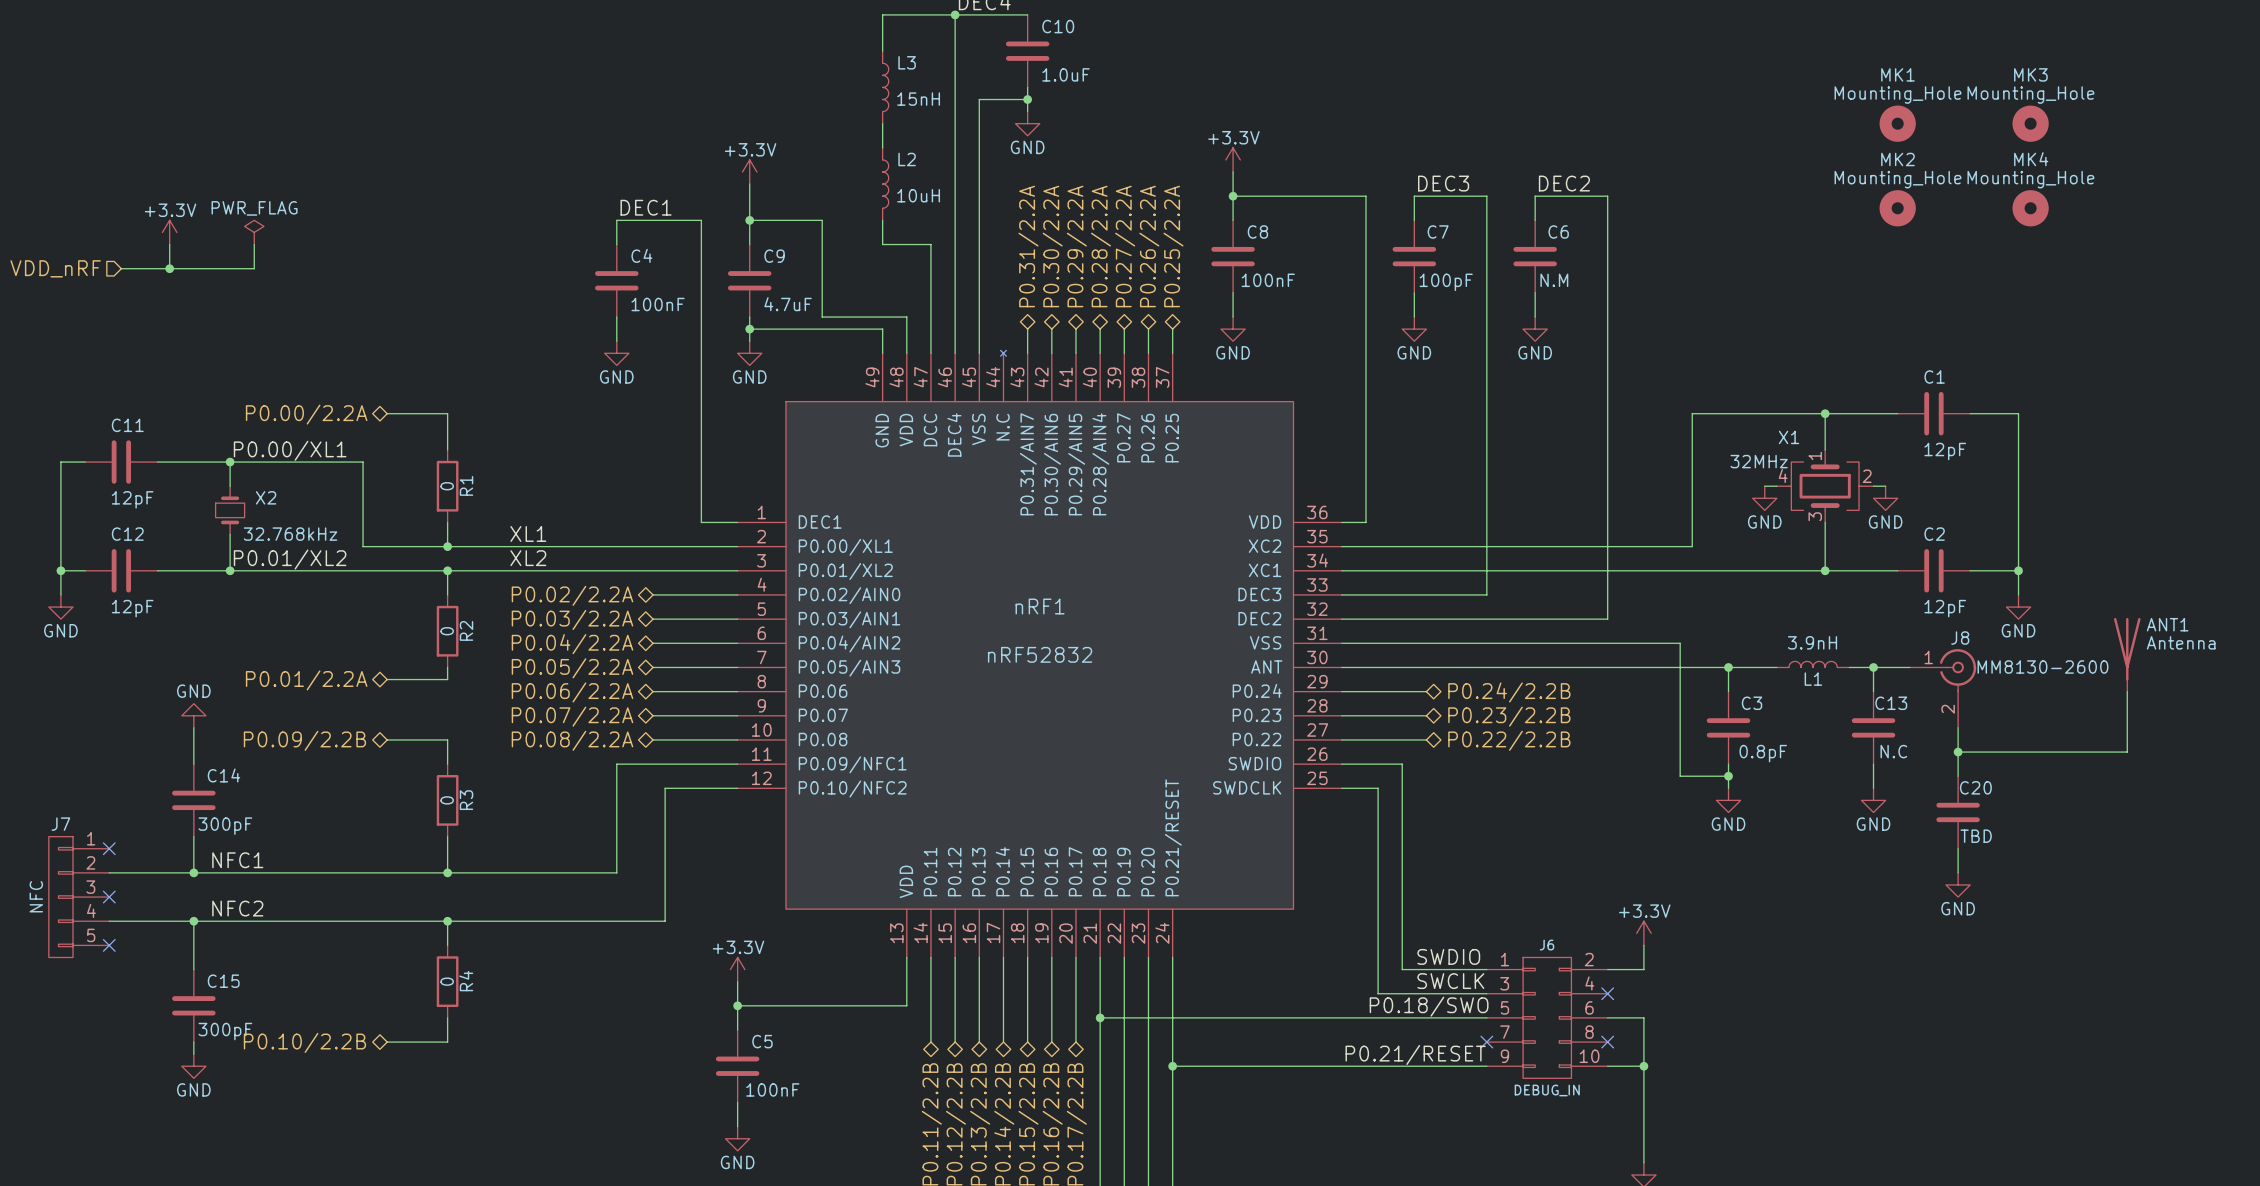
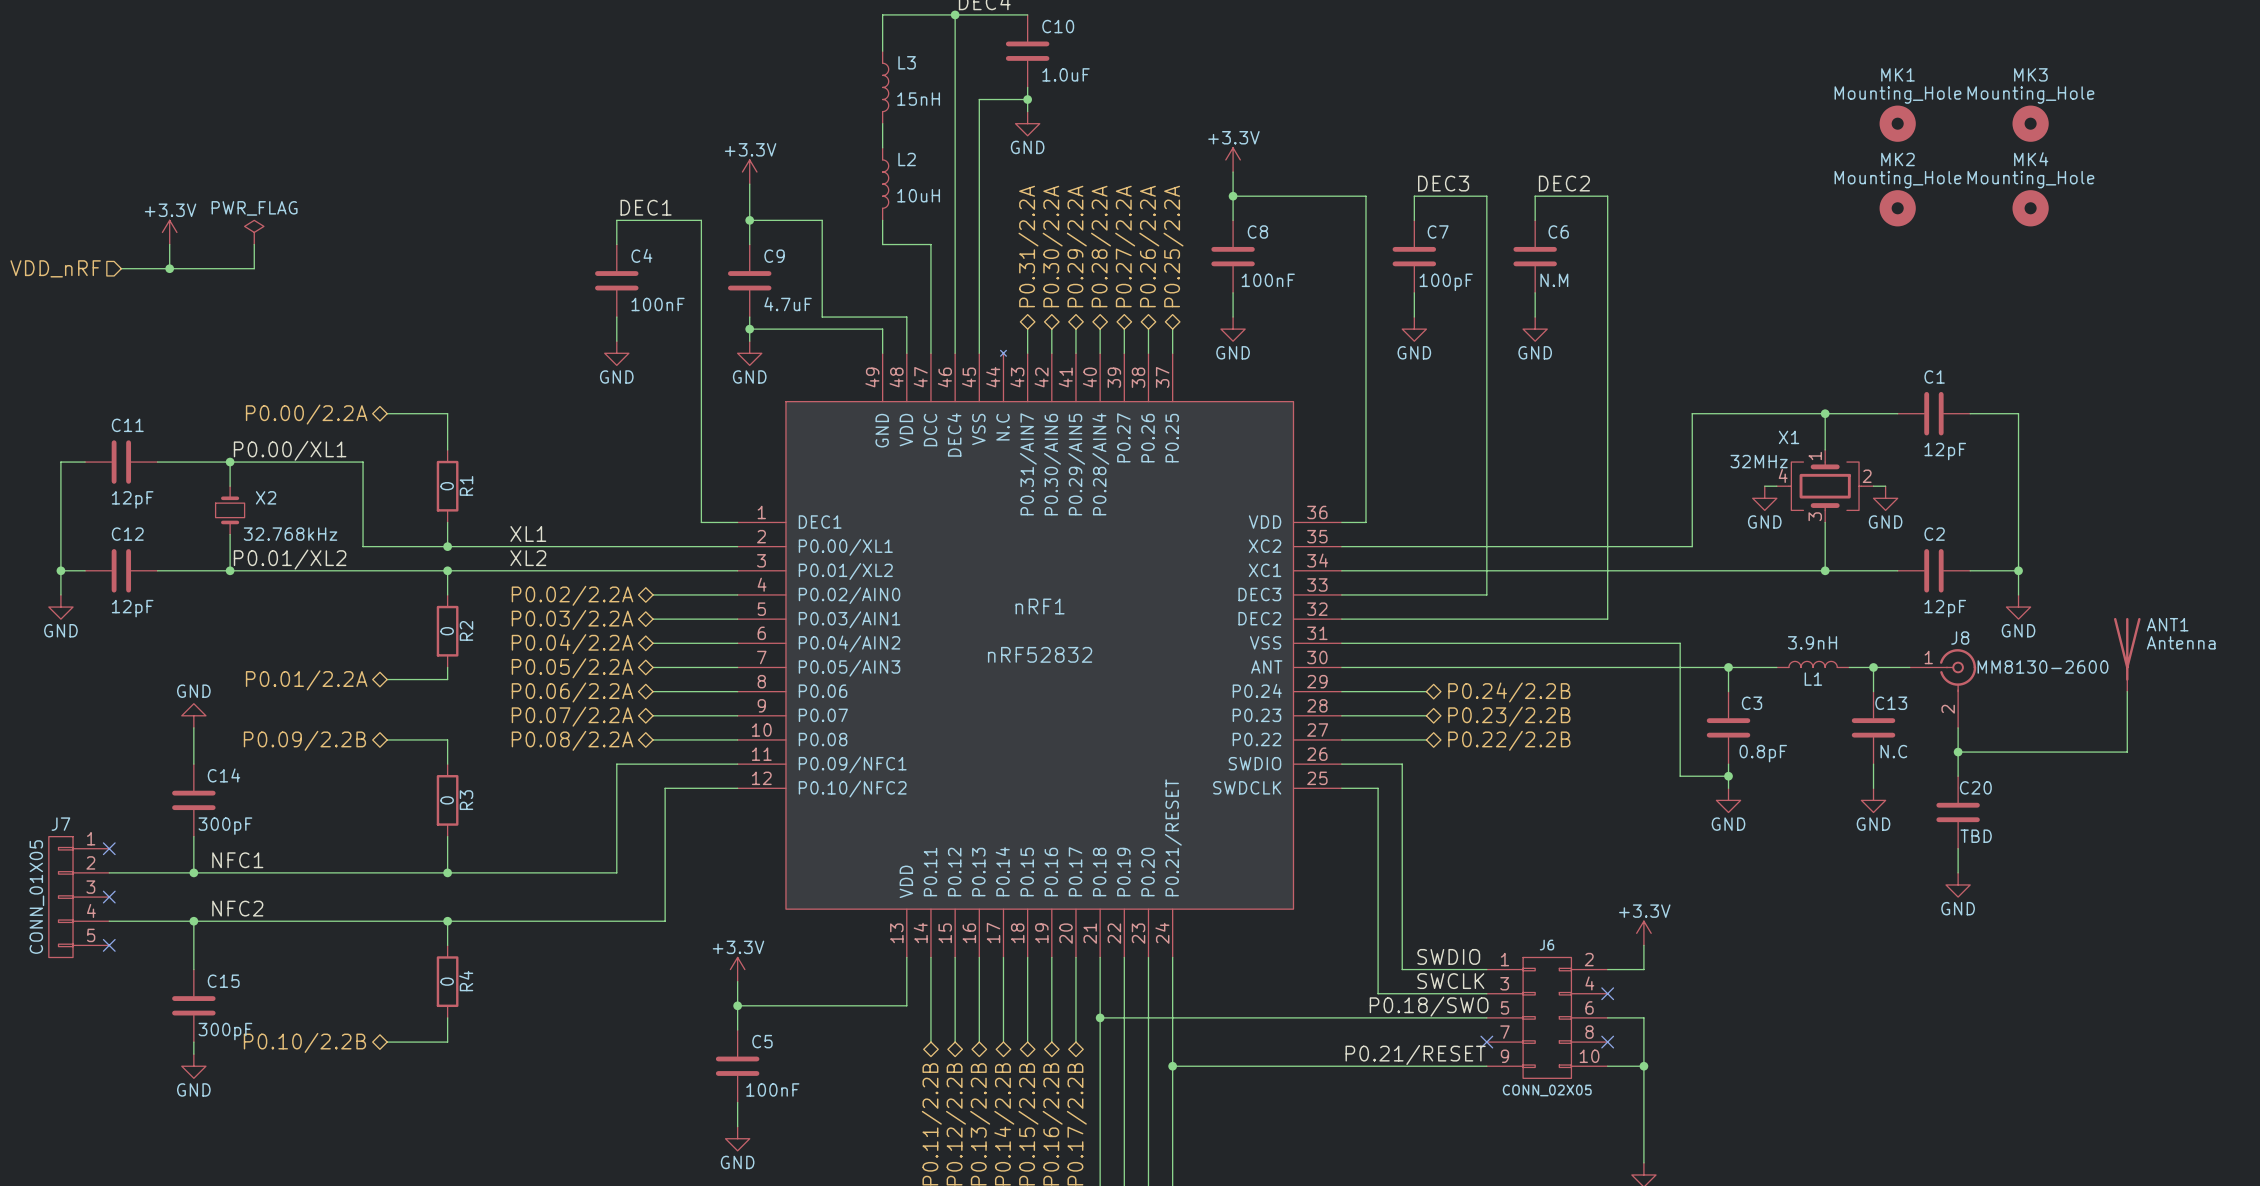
J7 value: NFC (36, 896) -> CONN_01X05 (36, 897)
J6 value: DEBUG_IN (1547, 1090) -> CONN_02X05 (1547, 1090)

